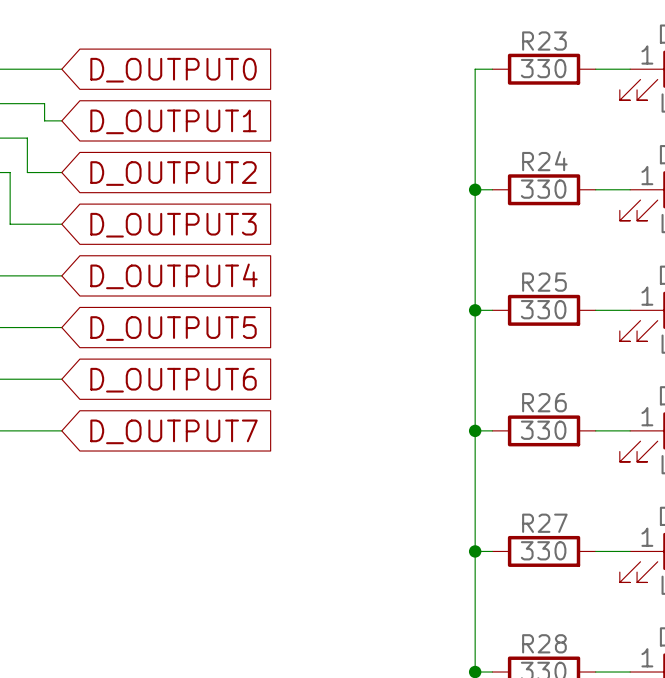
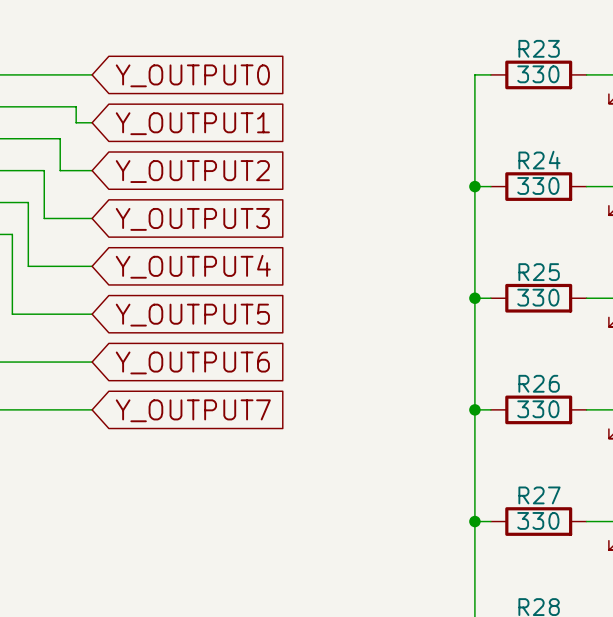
global label: D_OUTPUT0 (173, 70) -> Y_OUTPUT0 (192, 75)
global label: D_OUTPUT1 (173, 121) -> Y_OUTPUT1 (192, 123)
global label: D_OUTPUT2 (173, 173) -> Y_OUTPUT2 (192, 171)
global label: D_OUTPUT3 (173, 225) -> Y_OUTPUT3 (192, 219)
global label: D_OUTPUT4 (174, 276) -> Y_OUTPUT4 (193, 266)
global label: D_OUTPUT5 (173, 328) -> Y_OUTPUT5 (192, 315)
global label: D_OUTPUT6 (173, 380) -> Y_OUTPUT6 (192, 362)
global label: D_OUTPUT7 (174, 431) -> Y_OUTPUT7 (193, 410)

